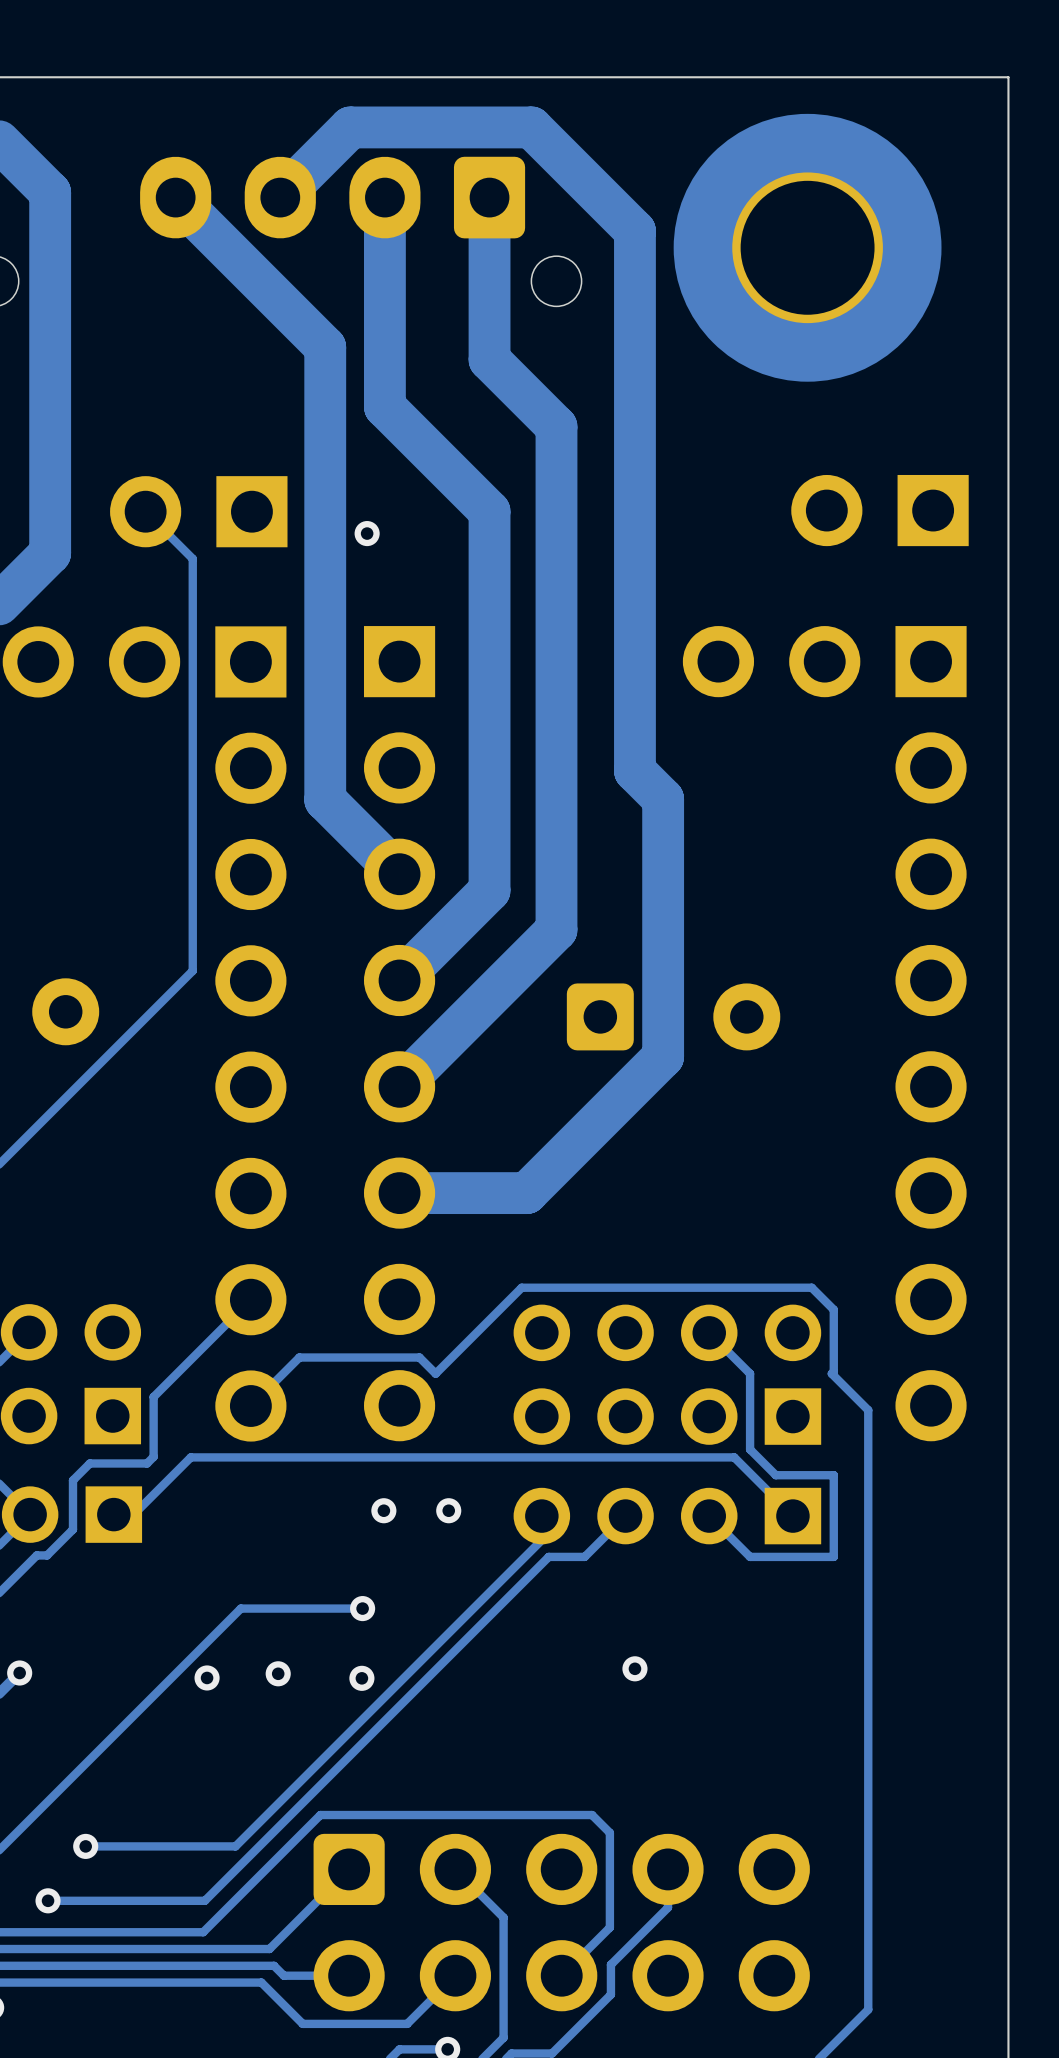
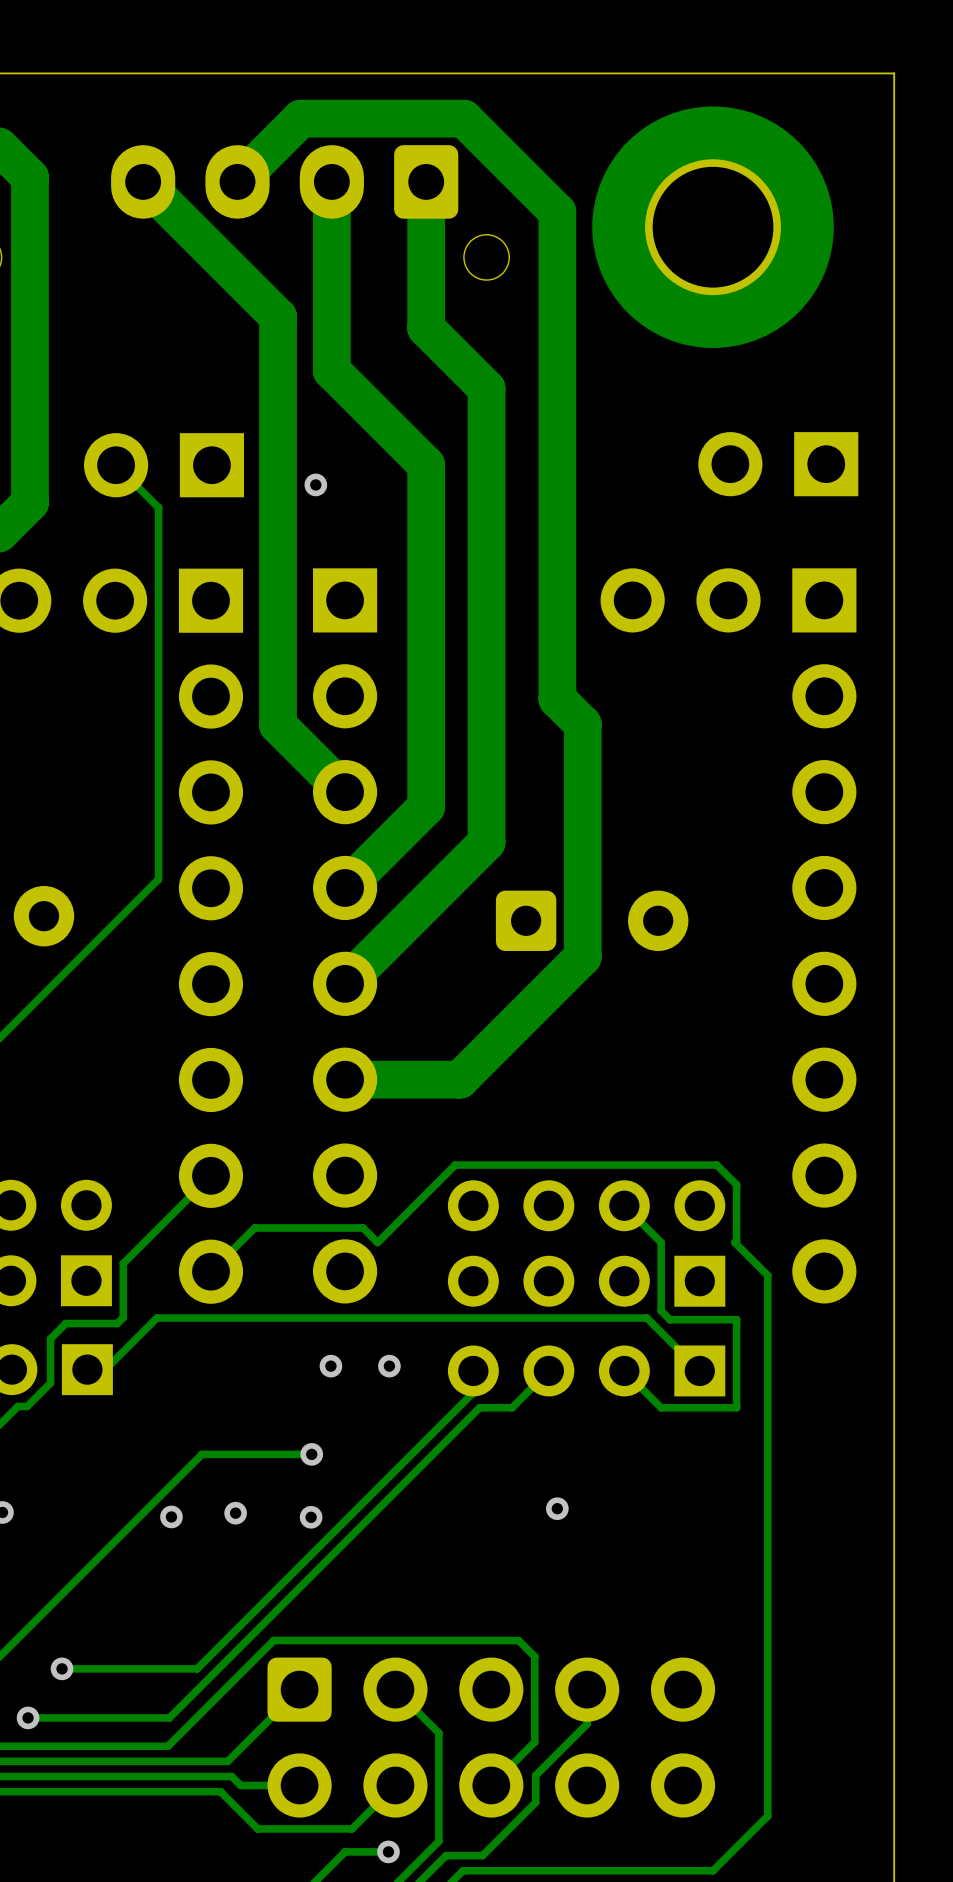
track: (759, 1459) (775, 1475) (833, 1475) -> (670, 1319) (736, 1319) (736, 1334)

